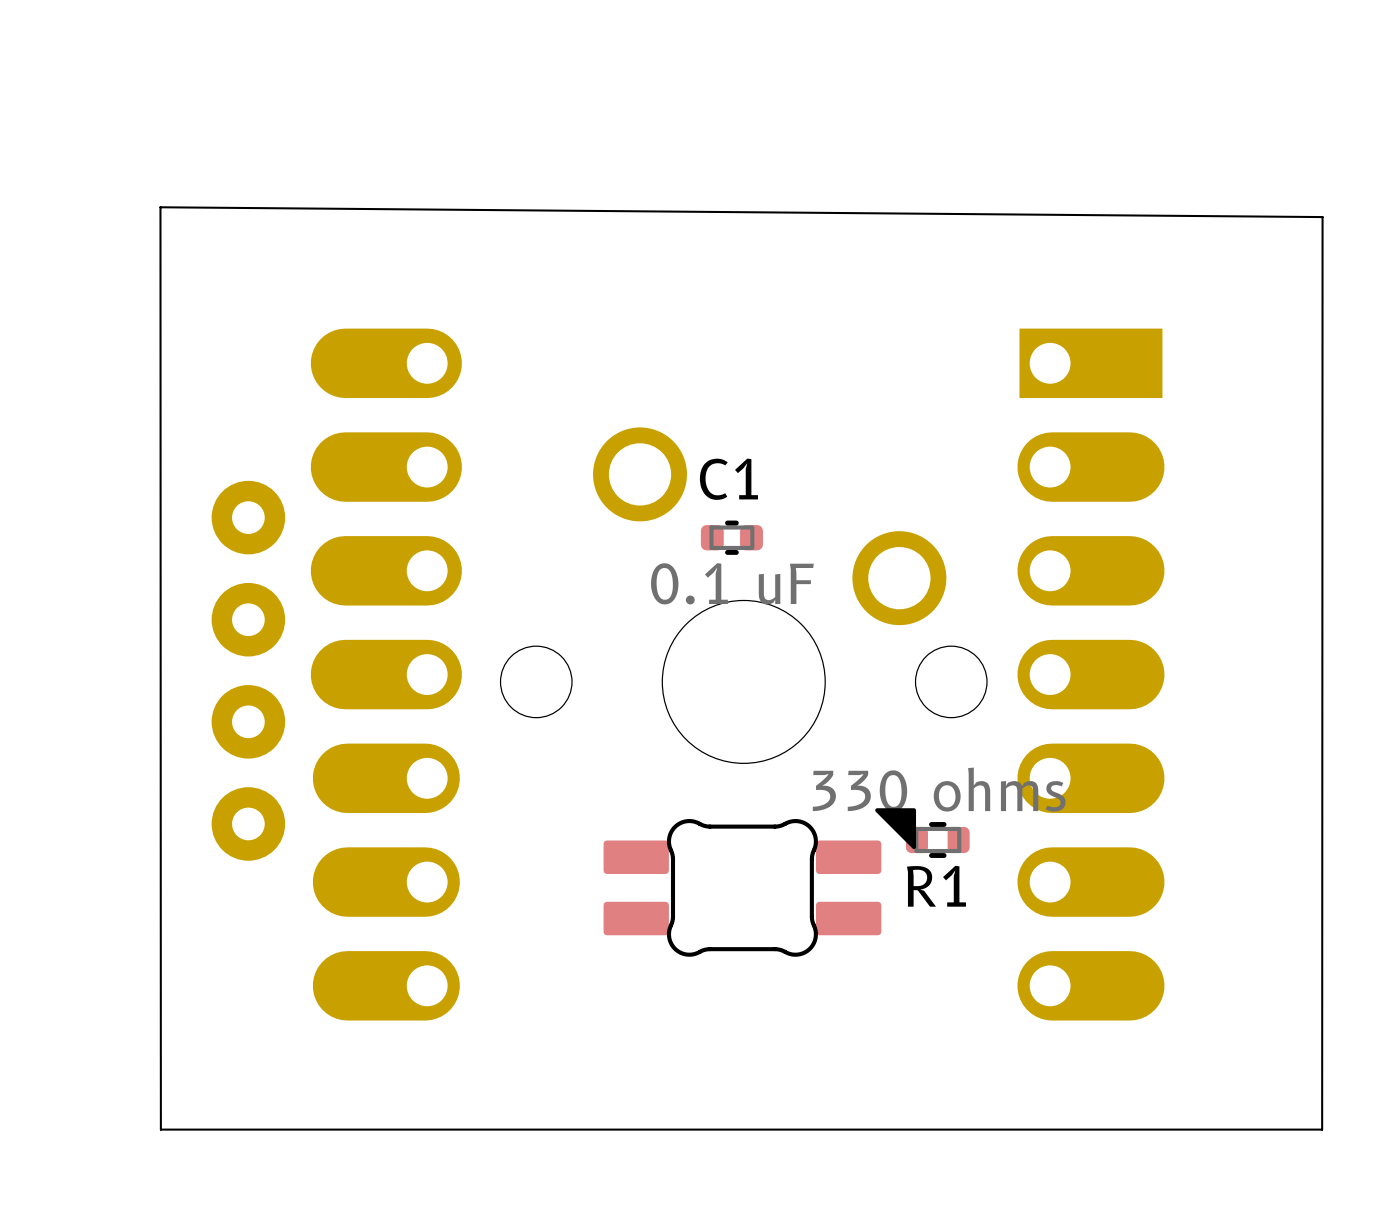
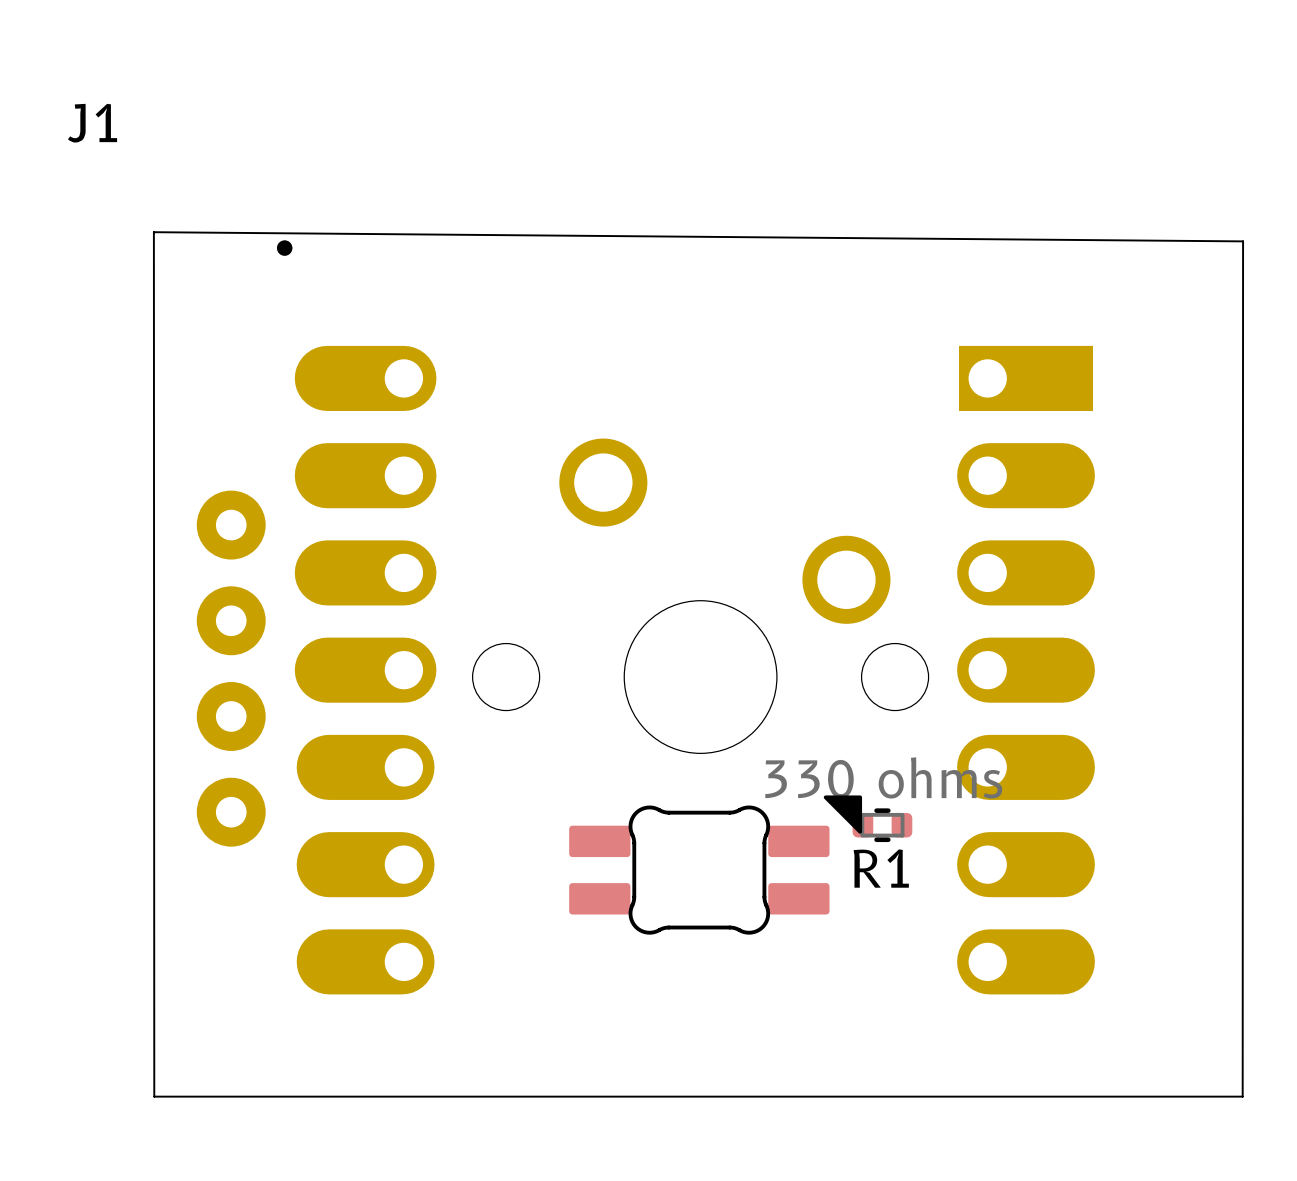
C1: 0.1 uF (731, 537) -> none
J1 side: bottom (248, 670) -> top (244, 543)

